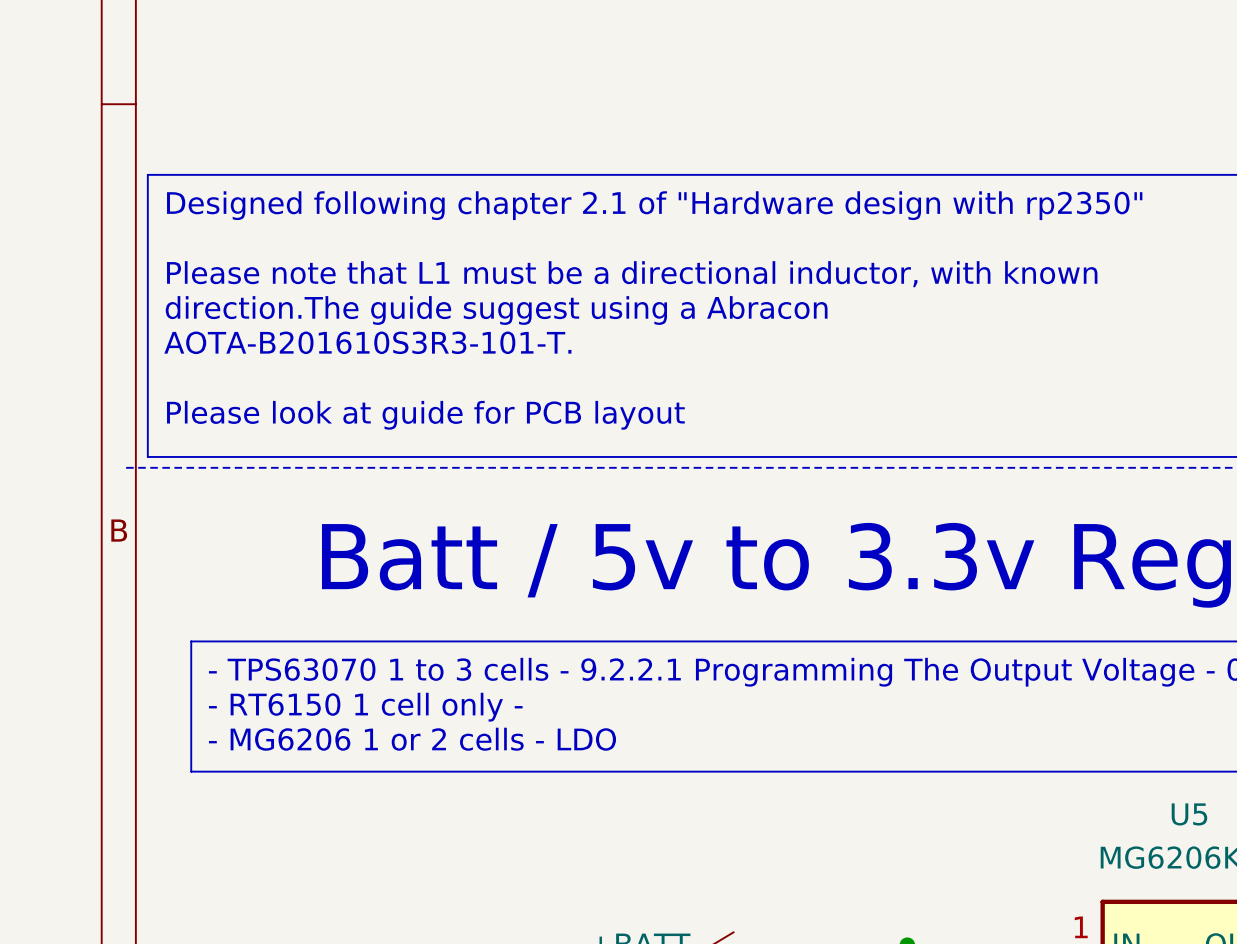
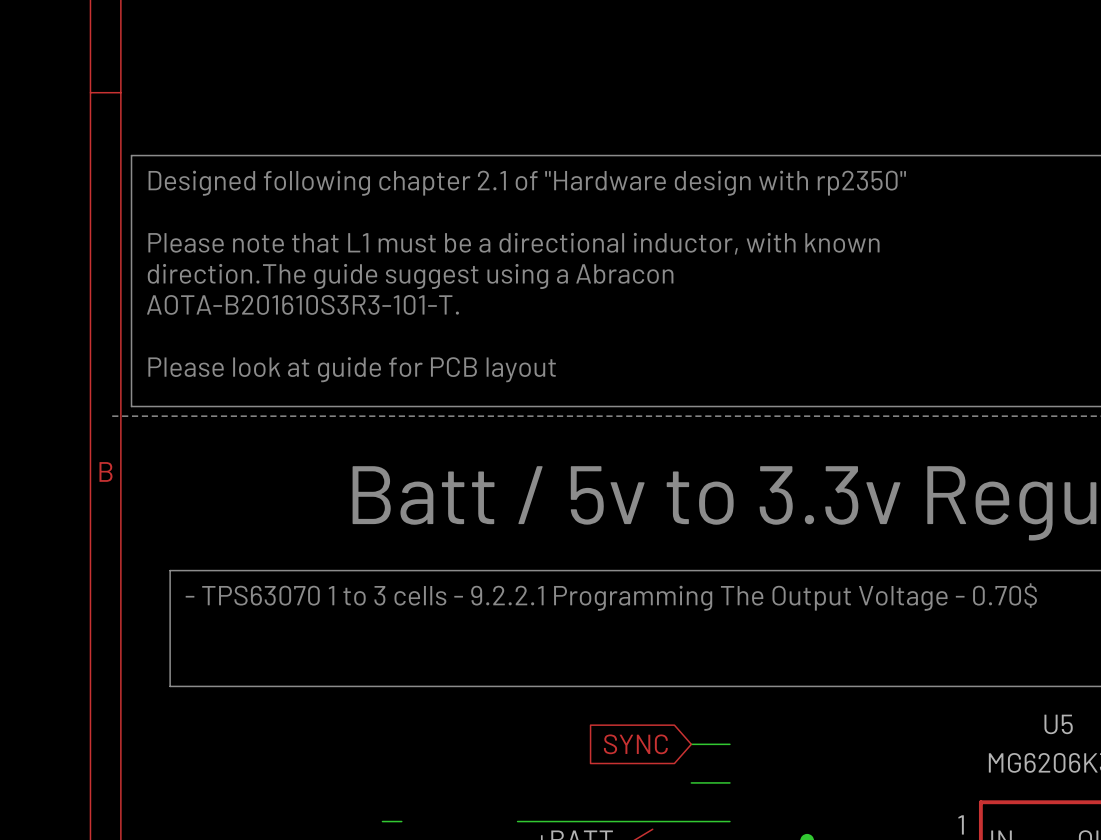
text: - RT6150 1 cell only - (365, 707) -> none
text: - MG6206 1 or 2 cells - LDO (412, 739) -> none
global label: none -> SYNC (635, 744)
wire: none -> (691, 744) (729, 744)
wire: none -> (691, 782) (729, 782)
wire: none -> (382, 821) (401, 821)
wire: none -> (517, 821) (729, 821)

